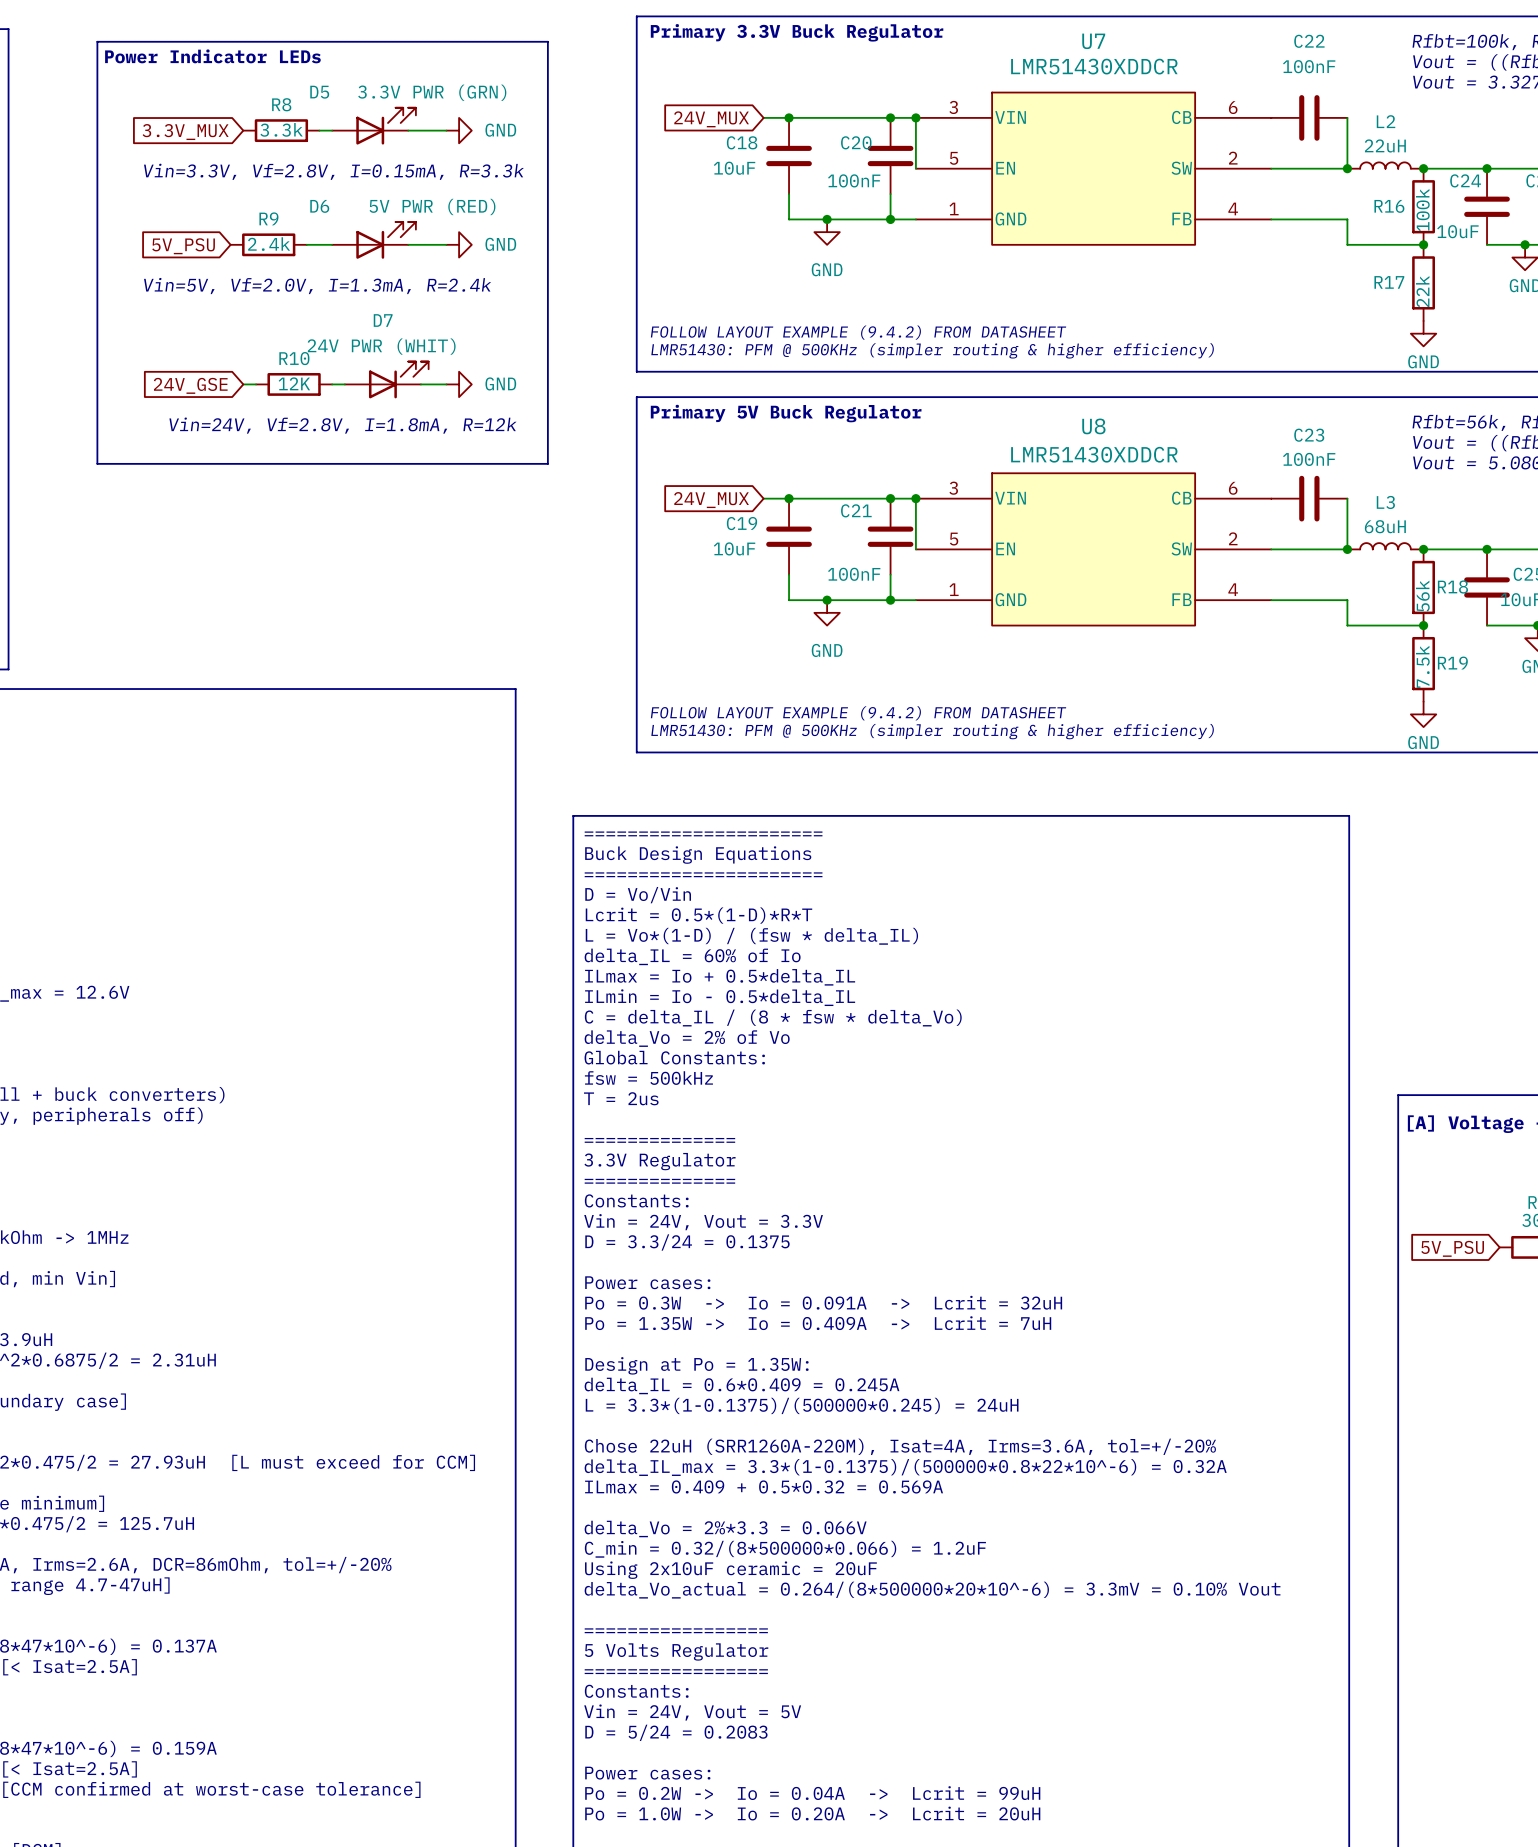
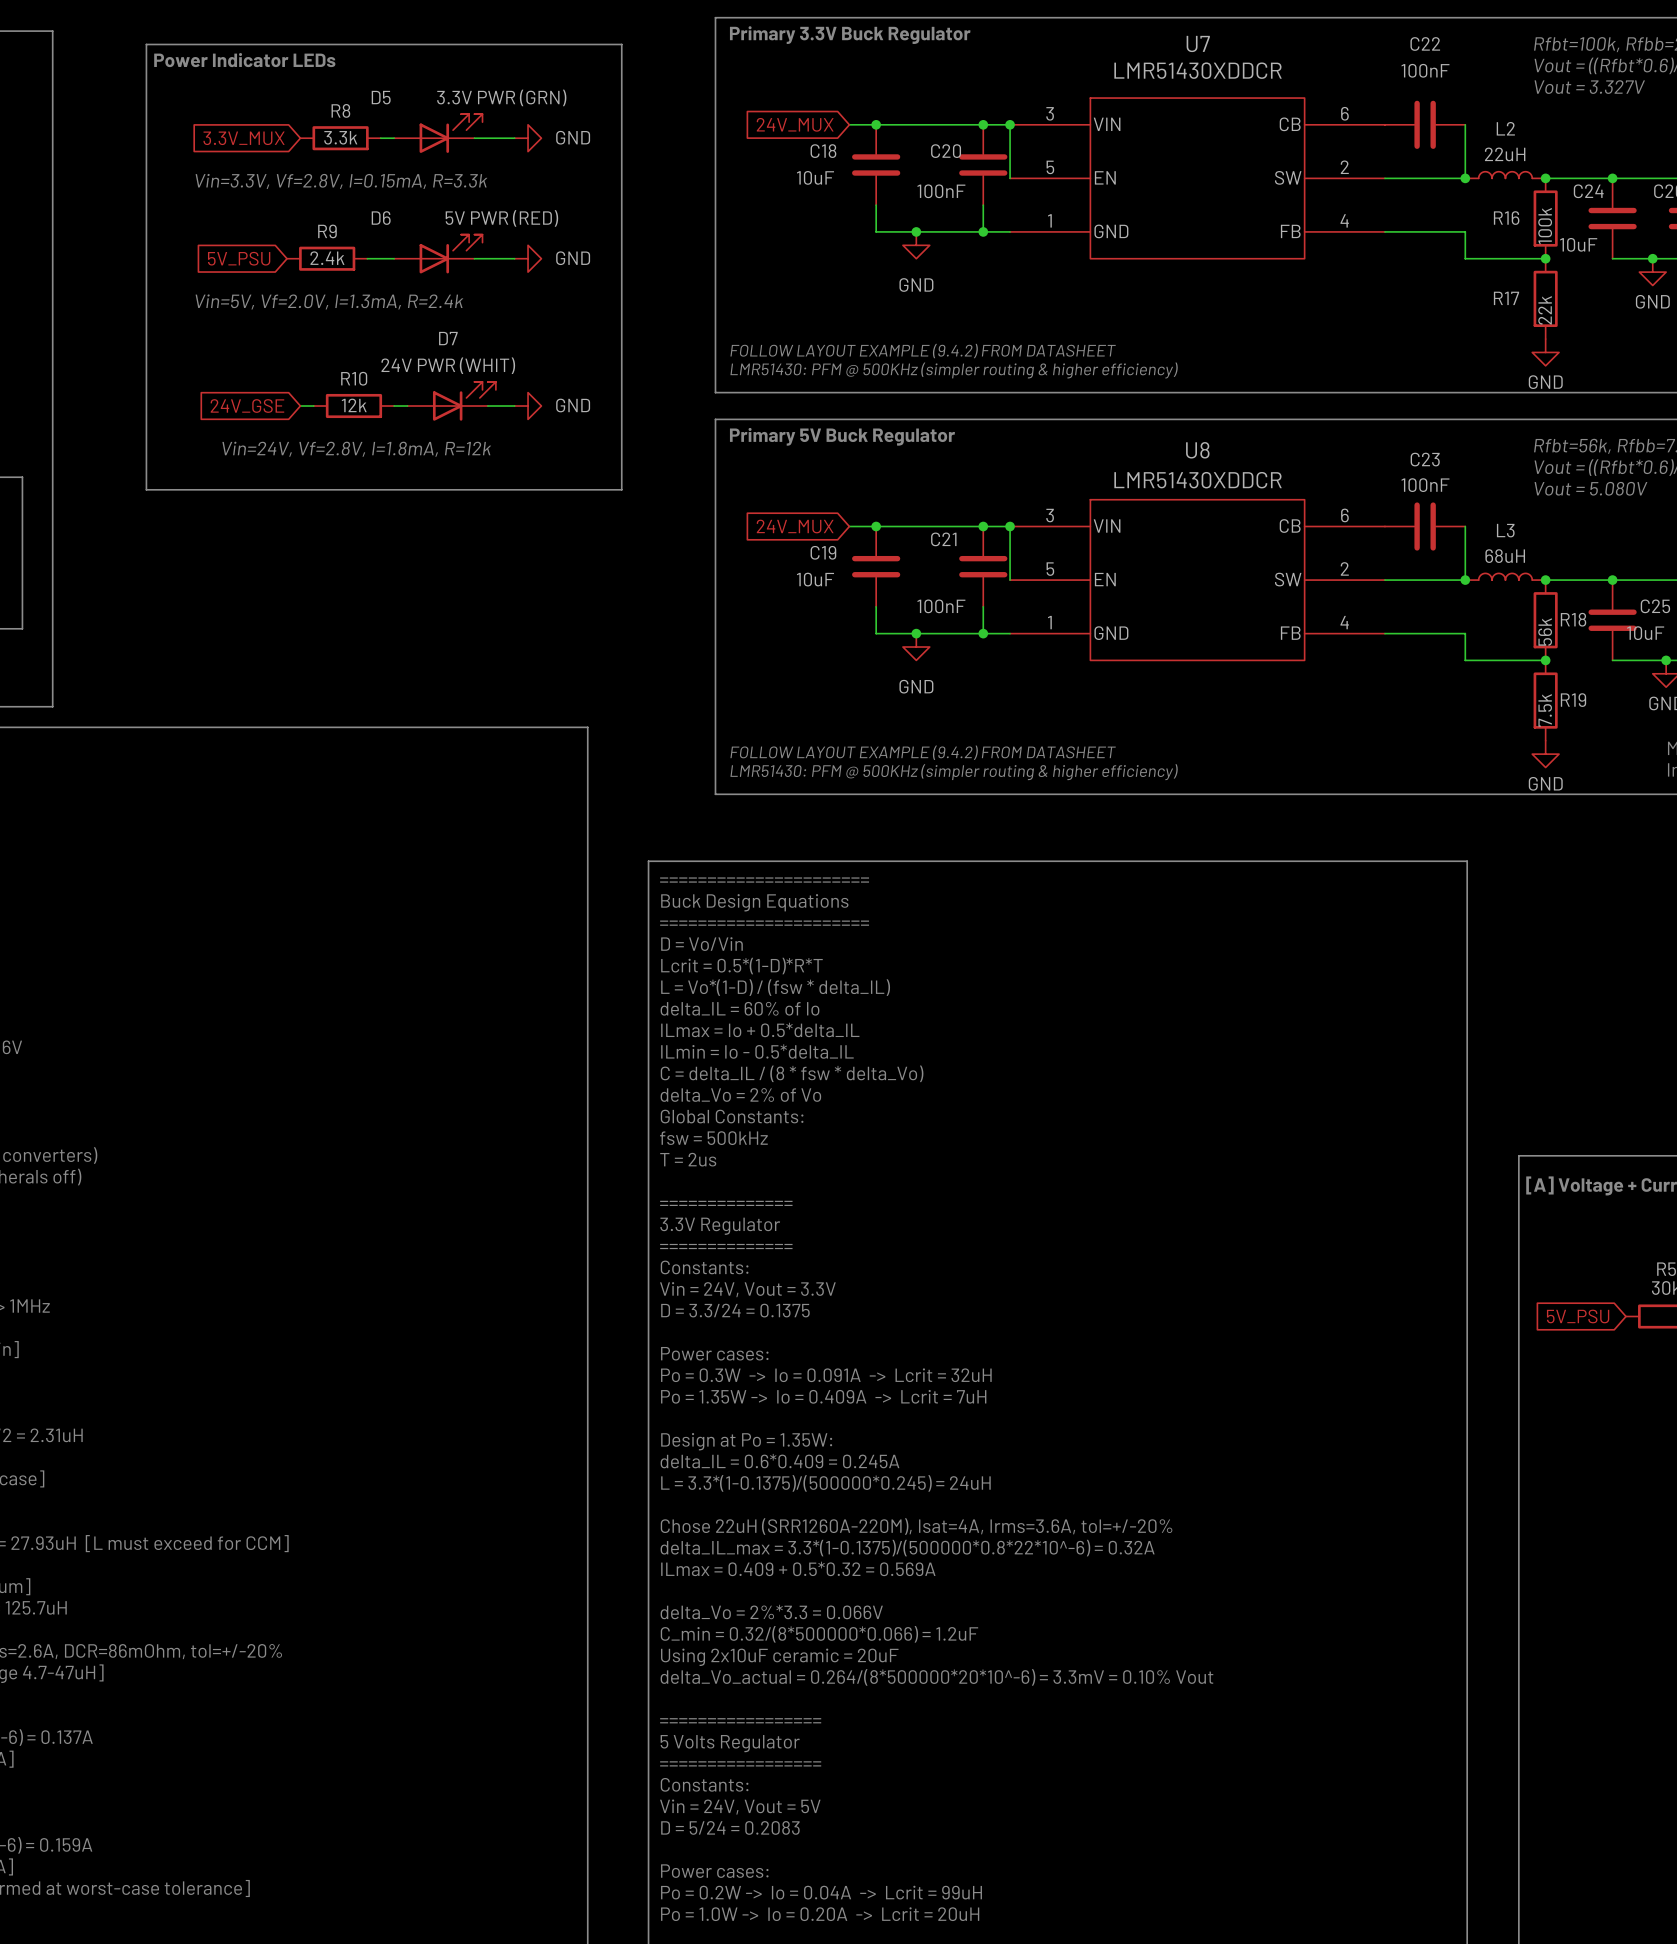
R10 value: 12K (294, 383) -> 12k (354, 405)

